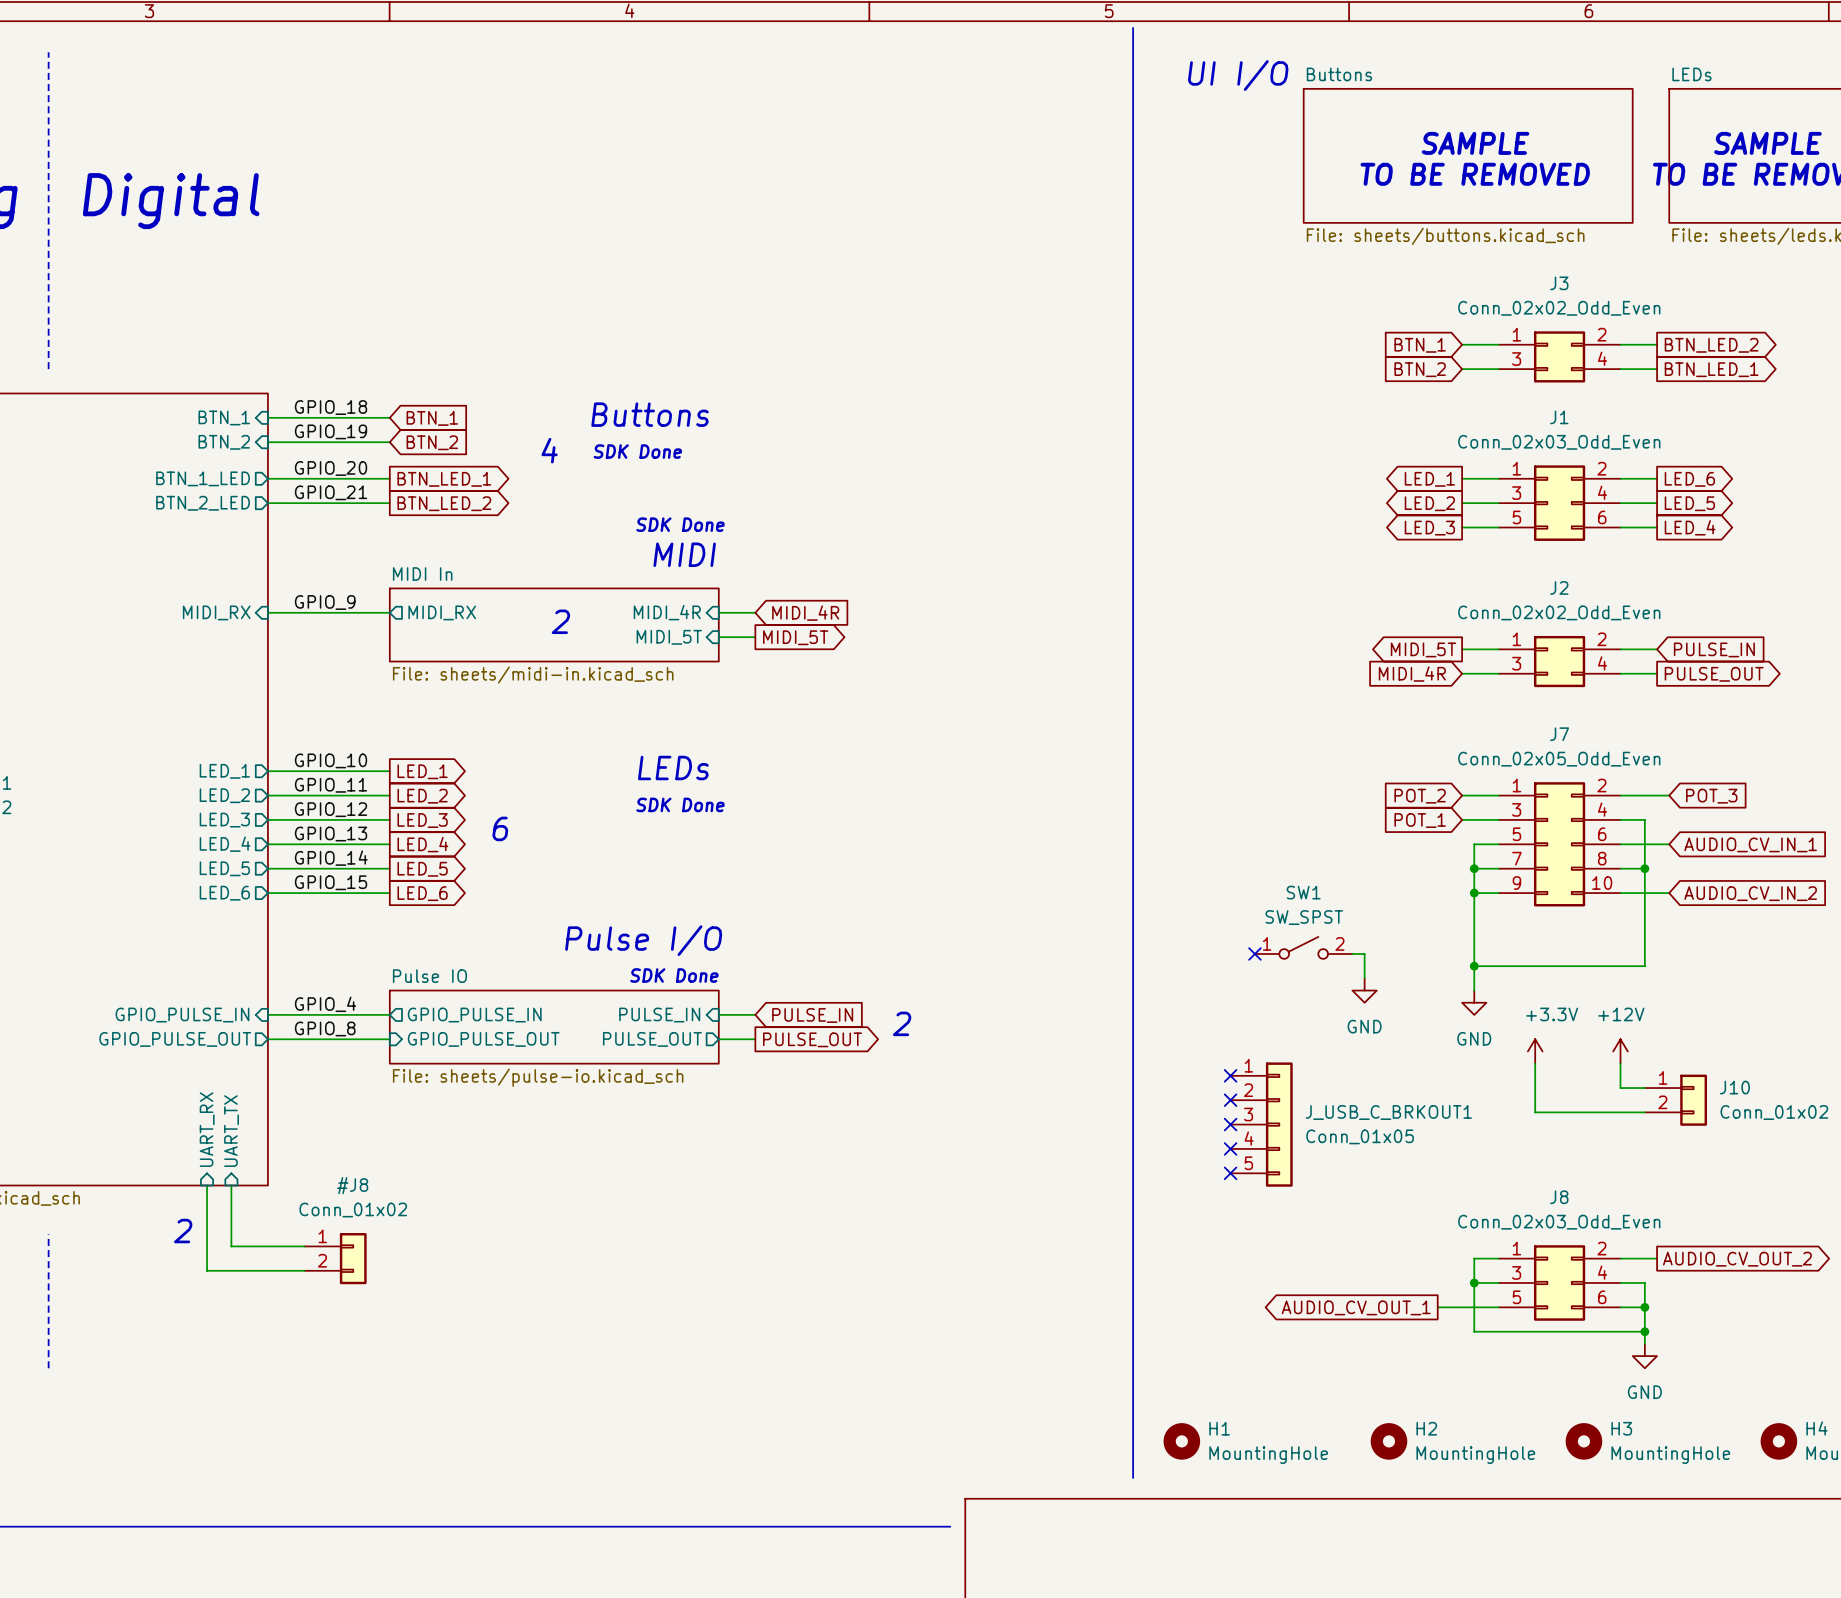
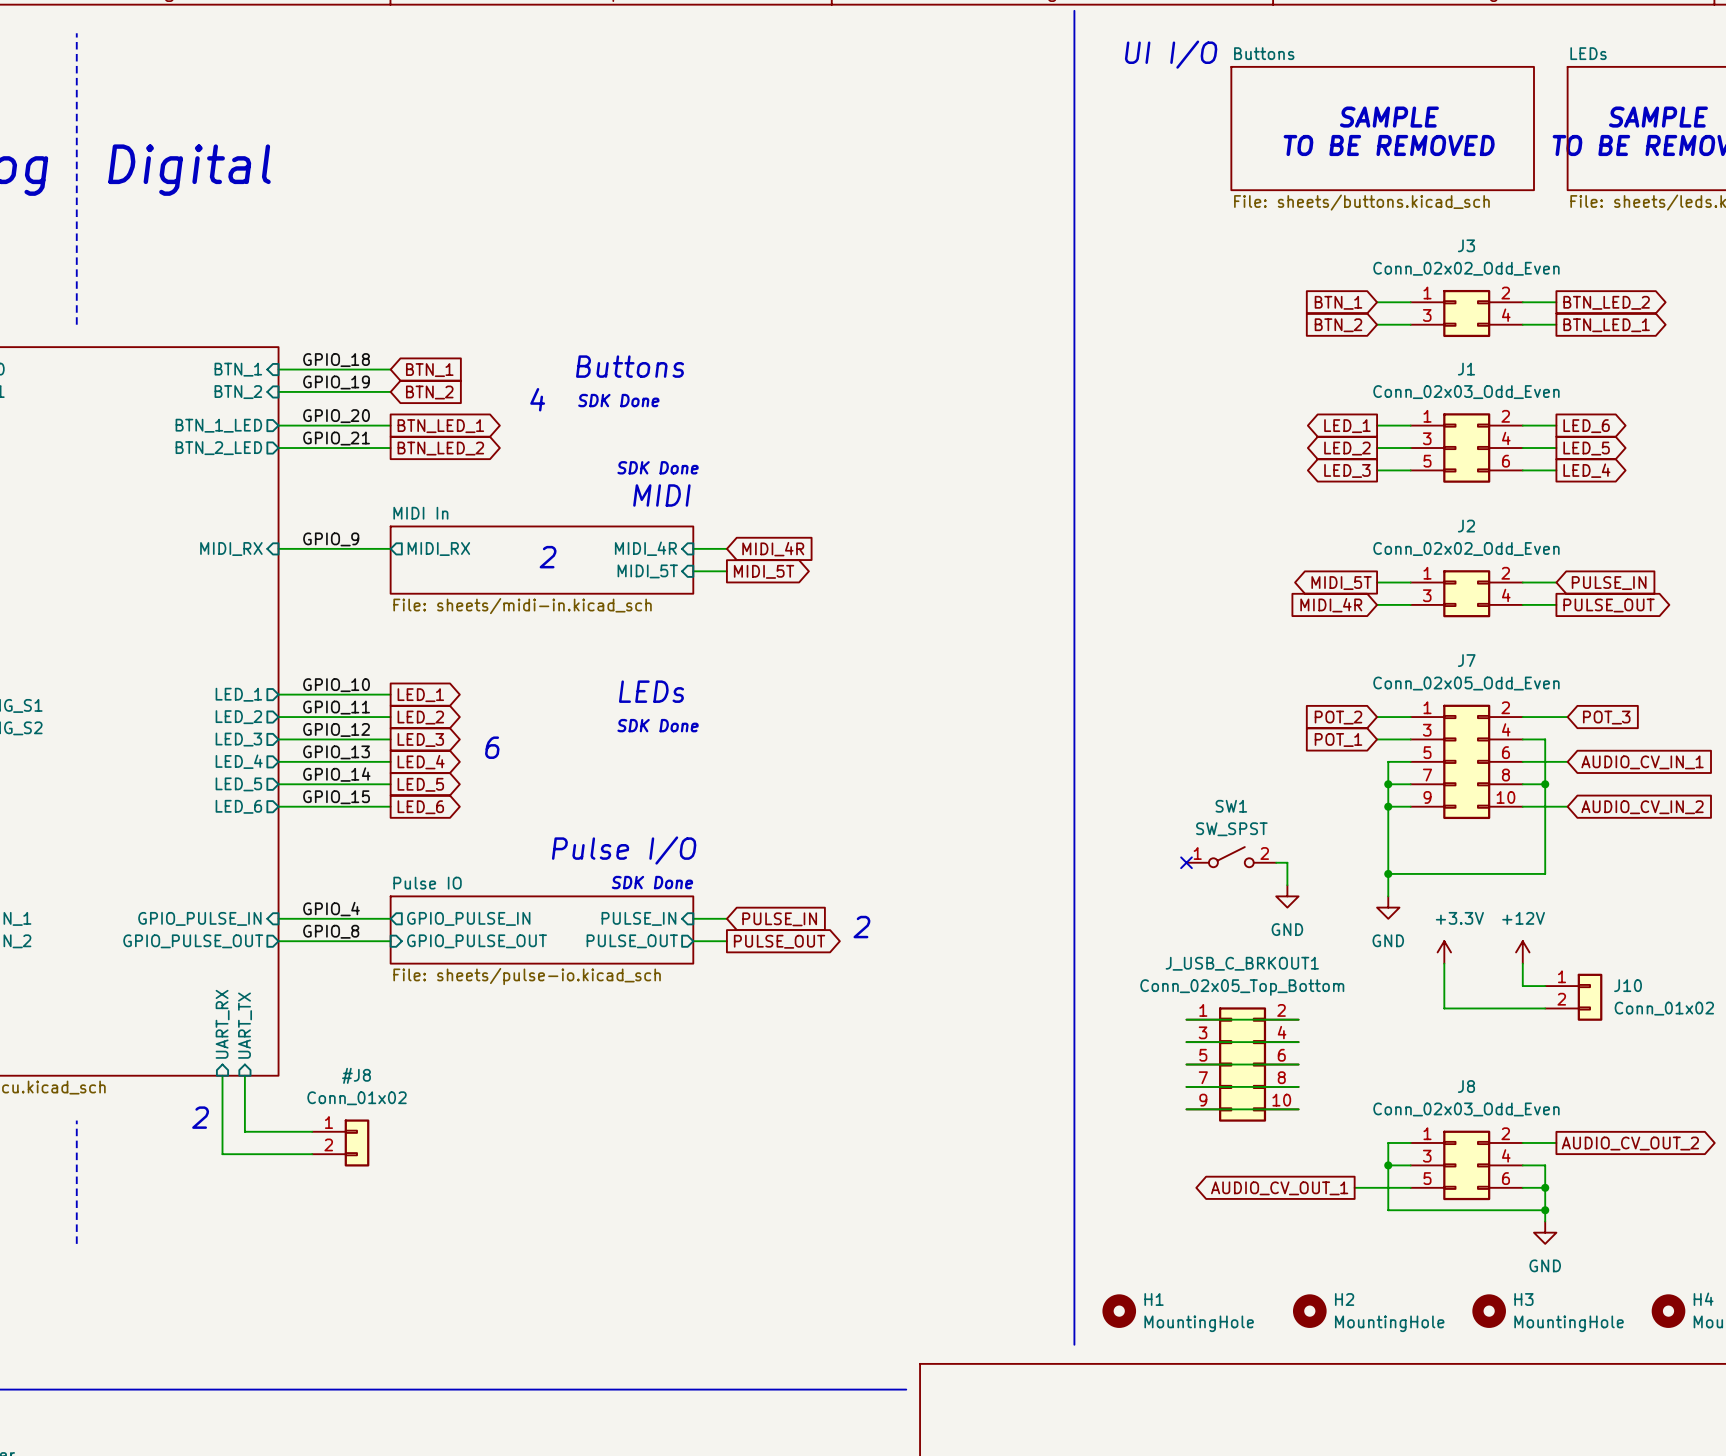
J_USB_C_BRKOUT1 symbol: [1230, 1062, 1293, 1187] -> [1186, 1007, 1299, 1122]
no-connect mark: (1230, 1075) -> none
no-connect mark: (1230, 1100) -> none
J_USB_C_BRKOUT1 name position: J_USB_C_BRKOUT1 (1388, 1112) -> J_USB_C_BRKOUT1 (1242, 963)
no-connect mark: (1230, 1124) -> none
wire: none -> (1186, 1019) (1298, 1019)
J_USB_C_BRKOUT1 value: Conn_01x05 (1360, 1136) -> Conn_02x05_Top_Bottom (1242, 987)
no-connect mark: (1230, 1148) -> none
wire: none -> (1186, 1042) (1298, 1042)
no-connect mark: (1230, 1173) -> none
wire: none -> (1186, 1064) (1298, 1064)
wire: none -> (1186, 1086) (1298, 1086)
wire: none -> (1186, 1109) (1298, 1109)

